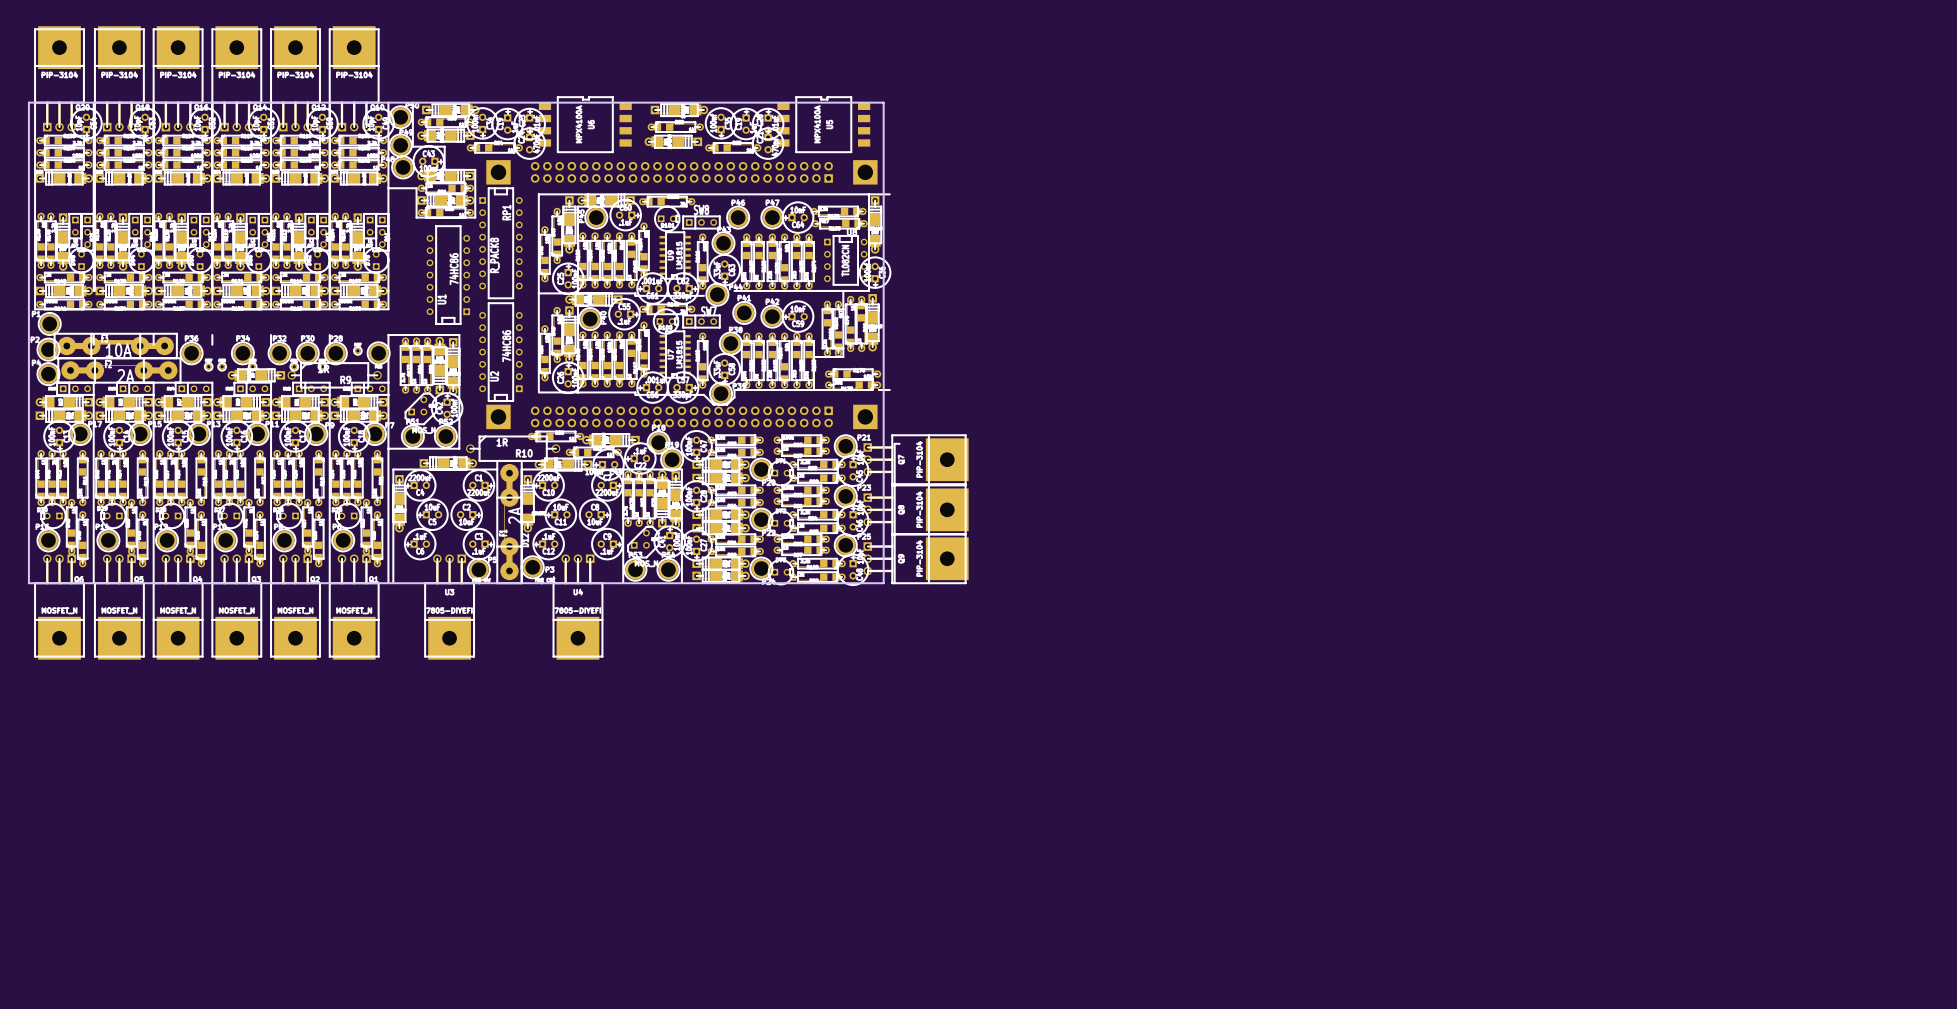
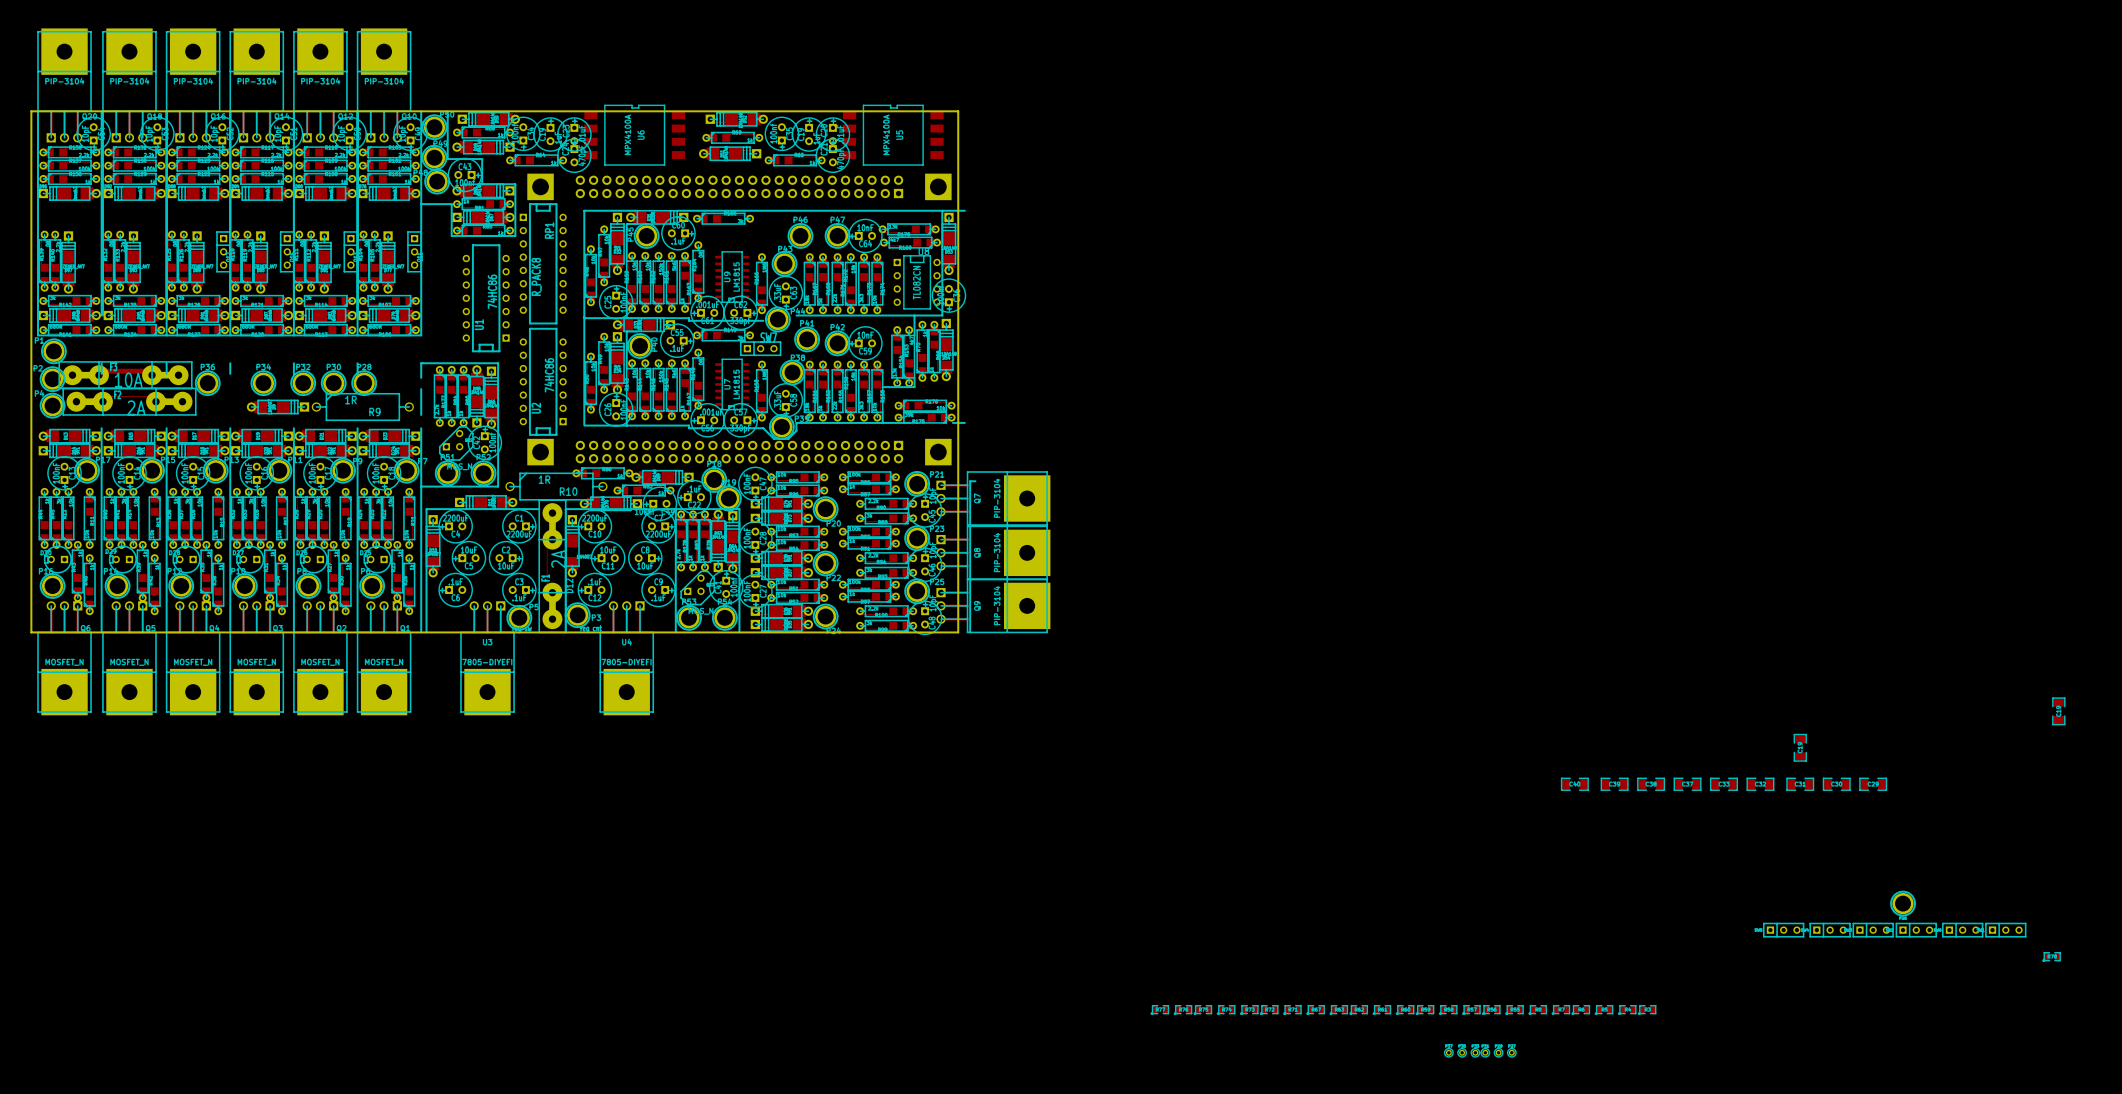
part: (667, 218) -> none
SW8: (701, 222) -> none
part: (75, 226) -> none
part: (135, 226) -> none
part: (194, 226) -> none
part: (252, 226) -> none
part: (311, 226) -> none
part: (370, 226) -> none
part: (87, 232) -> none
part: (147, 232) -> none
part: (81, 260) -> none
part: (141, 260) -> none
part: (200, 260) -> none
part: (258, 260) -> none
part: (317, 260) -> none
part: (376, 260) -> none
part: (666, 321) -> none
part position: (357, 350) -> (1511, 1052)
part position: (378, 353) -> (1903, 903)
part position: (208, 366) -> (1448, 1052)
part position: (222, 366) -> (1462, 1052)
part position: (252, 366) -> (1475, 1052)
part position: (294, 366) -> (1485, 1052)
part position: (322, 366) -> (1498, 1052)
part position: (75, 388) -> (1962, 930)
part position: (135, 388) -> (1783, 930)
part position: (194, 388) -> (1830, 930)
part position: (252, 388) -> (1873, 930)
part position: (311, 388) -> (1916, 930)
part position: (370, 388) -> (2005, 930)
part: (780, 473) -> none
part: (780, 523) -> none
part: (780, 572) -> none
part: none -> (2058, 711)
part: none -> (1800, 747)
part: none -> (1574, 784)
part: none -> (1614, 784)
part: none -> (1651, 784)
part: none -> (1687, 784)
part: none -> (1724, 784)
part: none -> (1760, 784)
part: none -> (1800, 784)
part: none -> (1836, 784)
part: none -> (1873, 784)
part: none -> (2051, 956)
part: none -> (1159, 1010)
part: none -> (1183, 1010)
part: none -> (1202, 1010)
part: none -> (1226, 1010)
part: none -> (1249, 1010)
part: none -> (1269, 1010)
part: none -> (1292, 1010)
part: none -> (1315, 1010)
part: none -> (1338, 1010)
part: none -> (1358, 1010)
part: none -> (1381, 1010)
part: none -> (1405, 1010)
part: none -> (1424, 1010)
part: none -> (1448, 1010)
part: none -> (1471, 1010)
part: none -> (1491, 1010)
part: none -> (1514, 1010)
part: none -> (1537, 1010)
part: none -> (1560, 1010)
part: none -> (1580, 1010)
part: none -> (1604, 1010)
part: none -> (1627, 1010)
part: none -> (1647, 1010)

